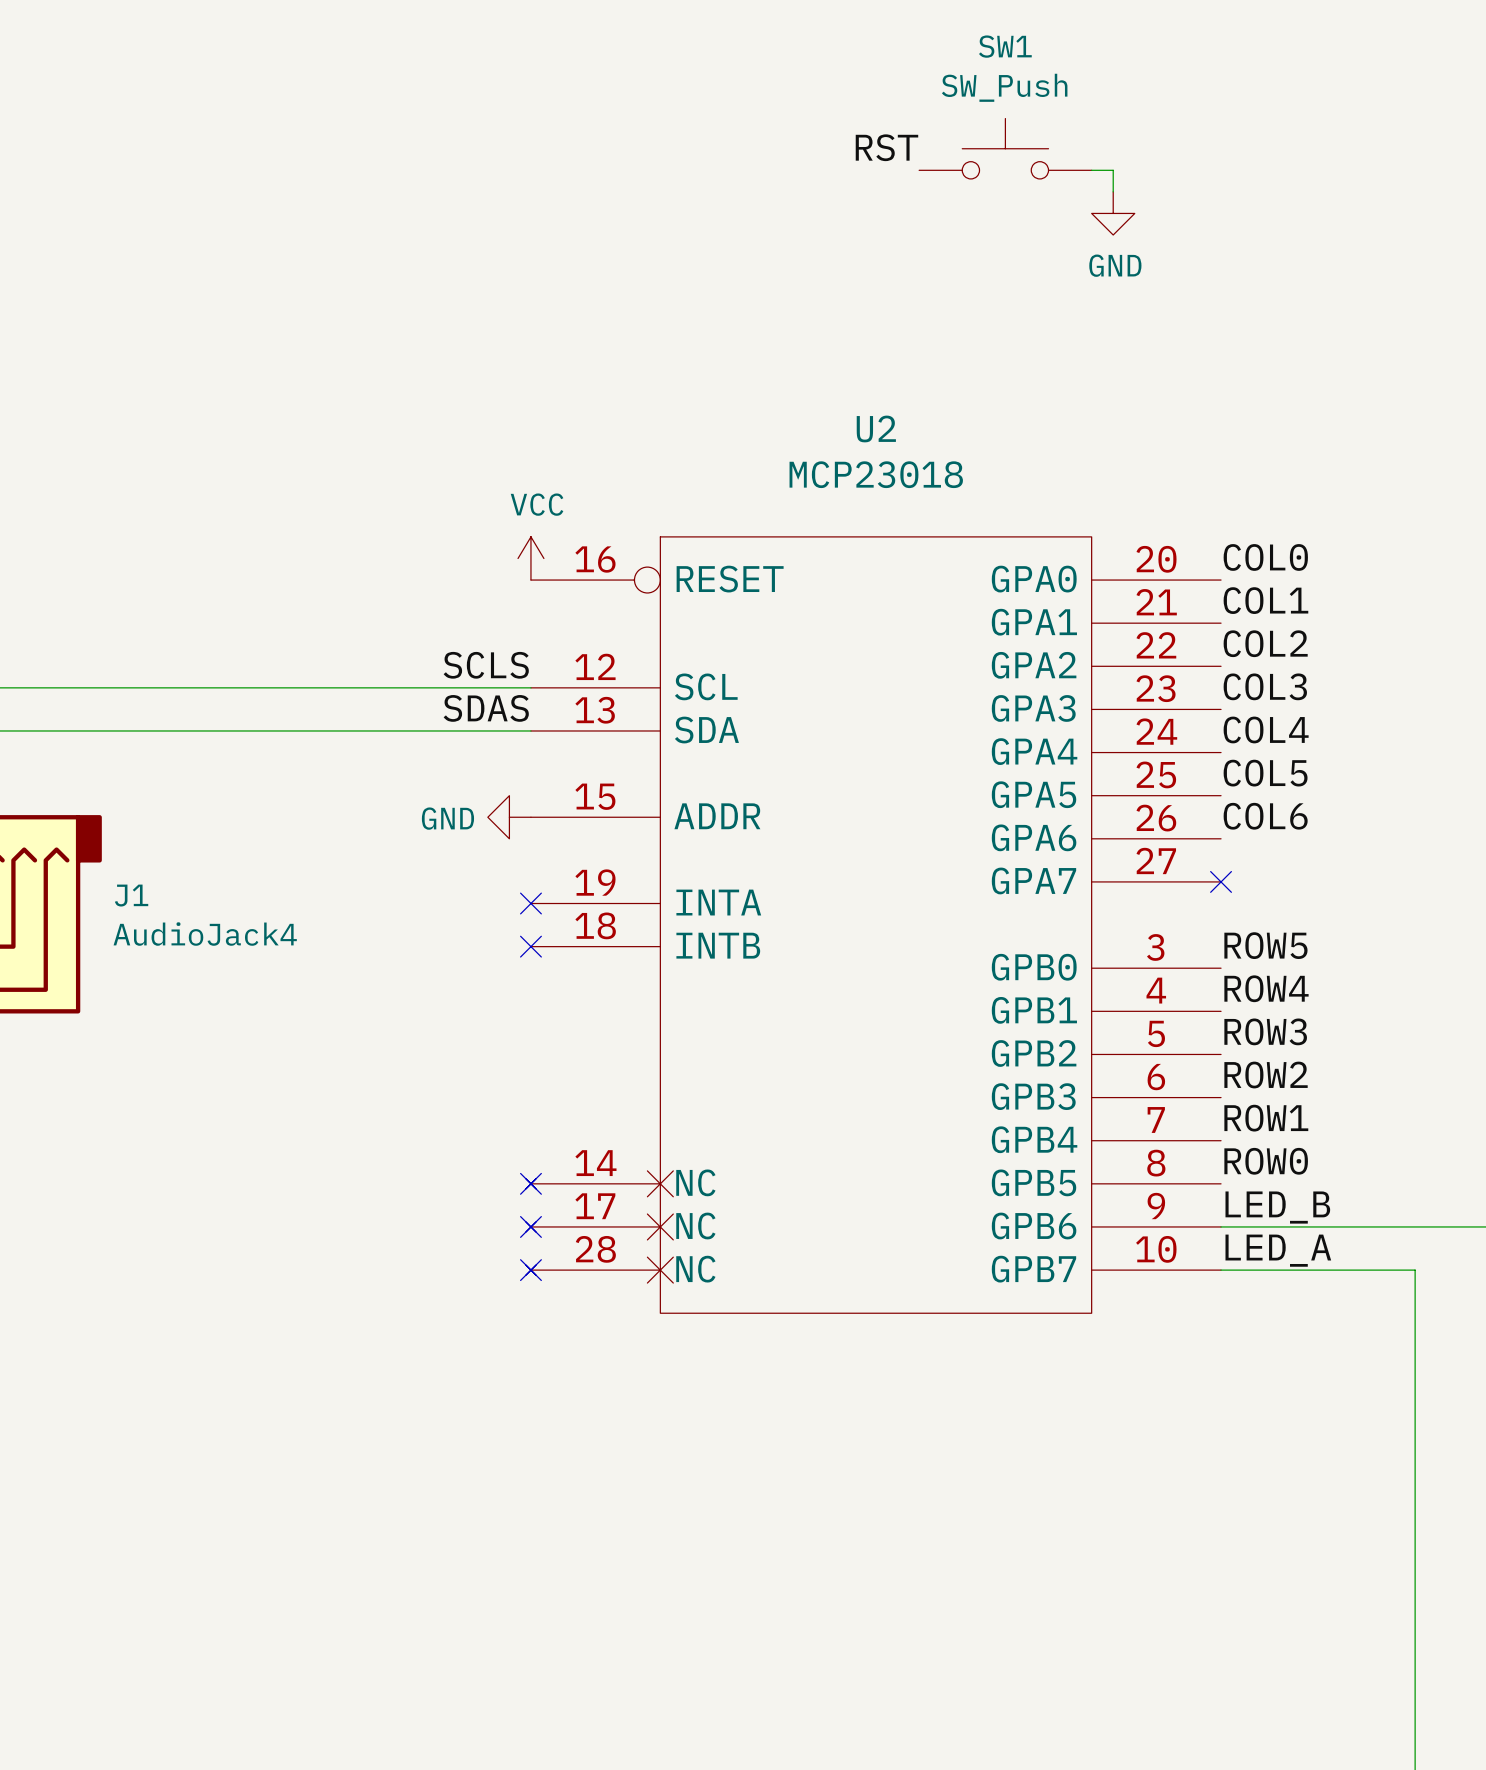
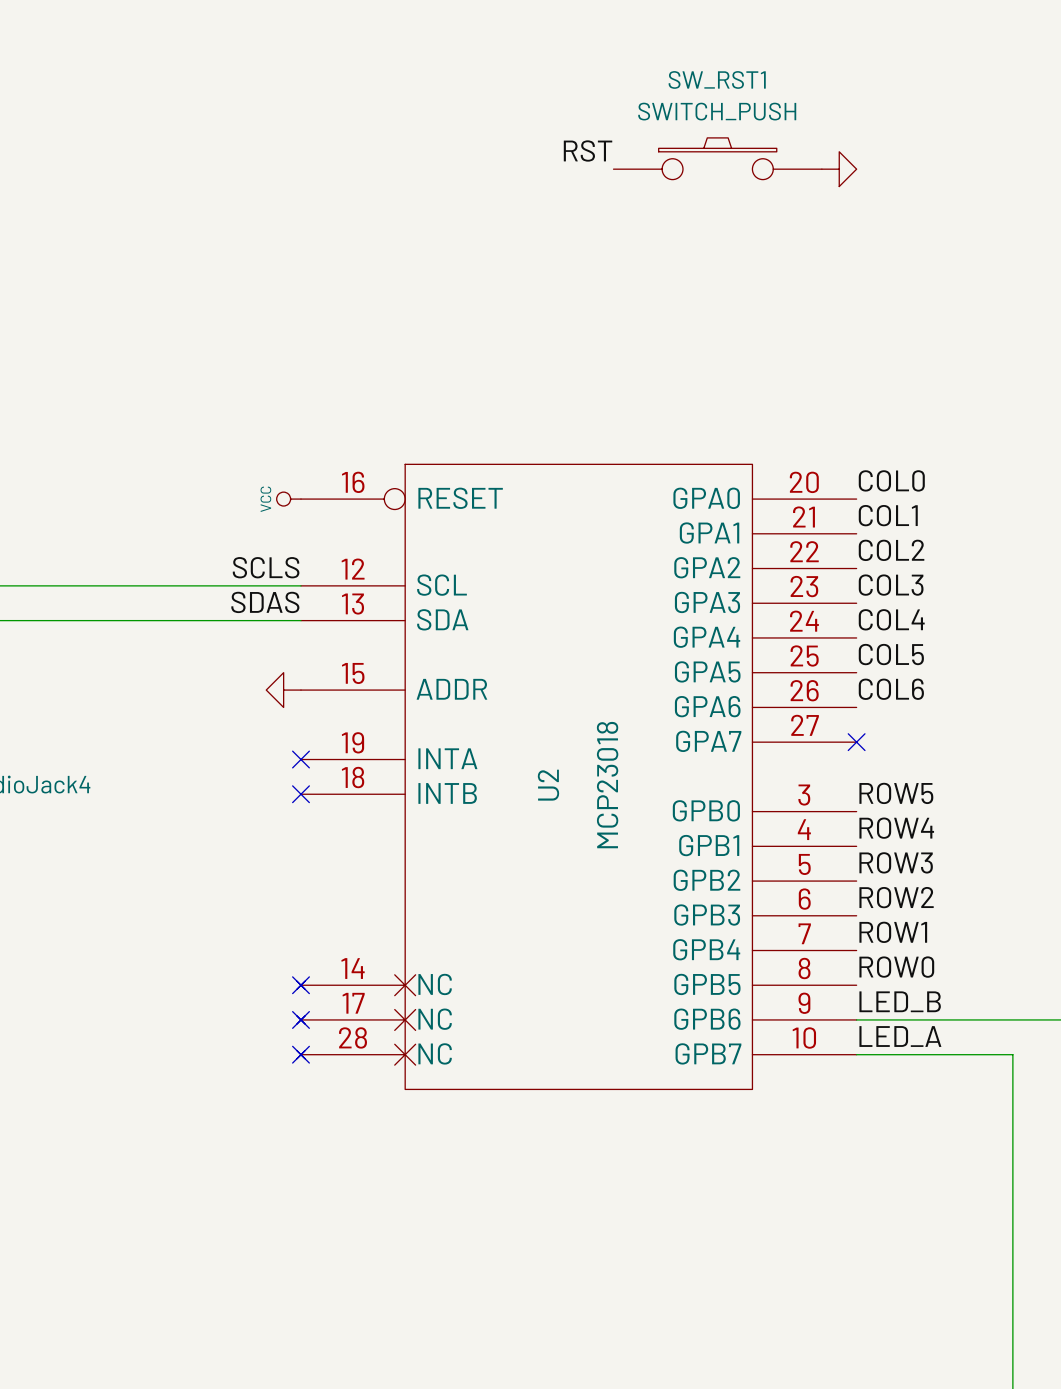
SW1: SW_Push (1005, 148) -> none
SW_RST1: none -> SWITCH_PUSH (717, 158)
wire: (1091, 170) (1113, 170) (1113, 191) -> none
power symbol: none -> (839, 169)
power symbol: GND (1113, 213) -> none
U2 name rotation: 0° (876, 428) -> 90° counterclockwise (548, 785)
U2 name position: U2 (876, 428) -> U2 (548, 785)
U2 value rotation: 0° (876, 474) -> 90° counterclockwise (607, 785)
U2 value position: MCP23018 (876, 474) -> MCP23018 (607, 785)
power symbol: VCC (530, 558) -> none
power symbol: none -> VCC (288, 499)
power symbol text: GND (447, 818) -> none

